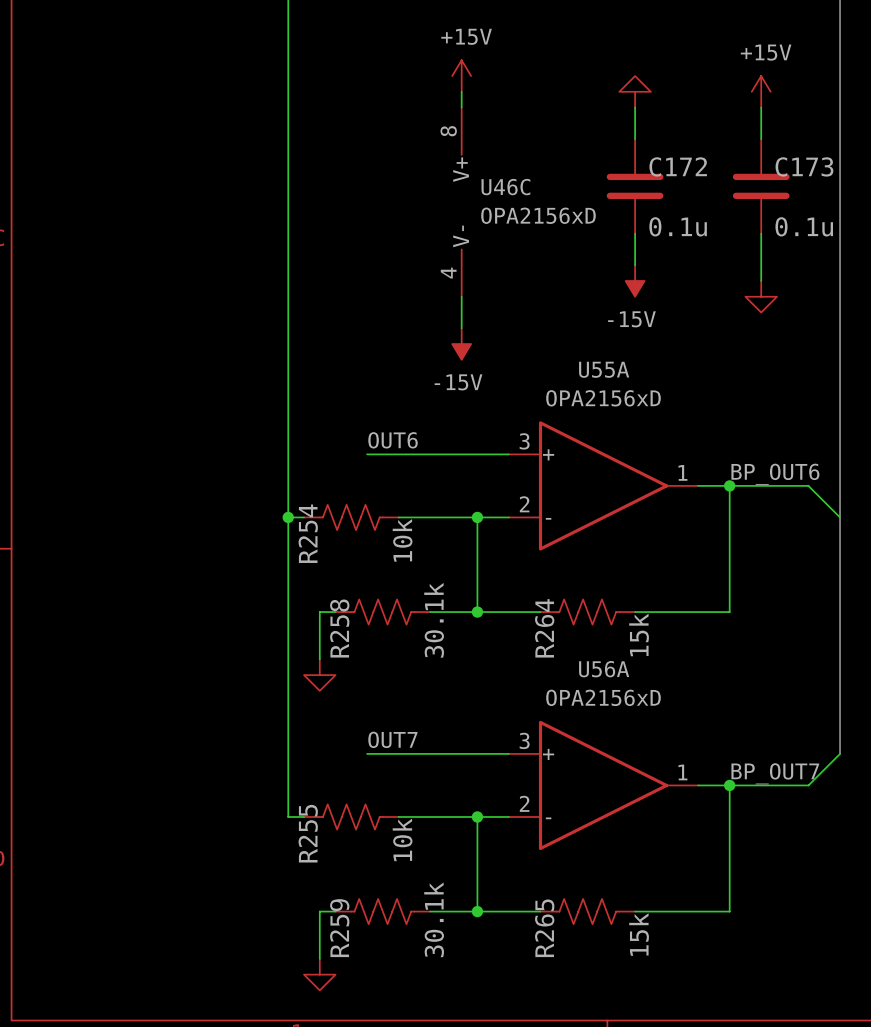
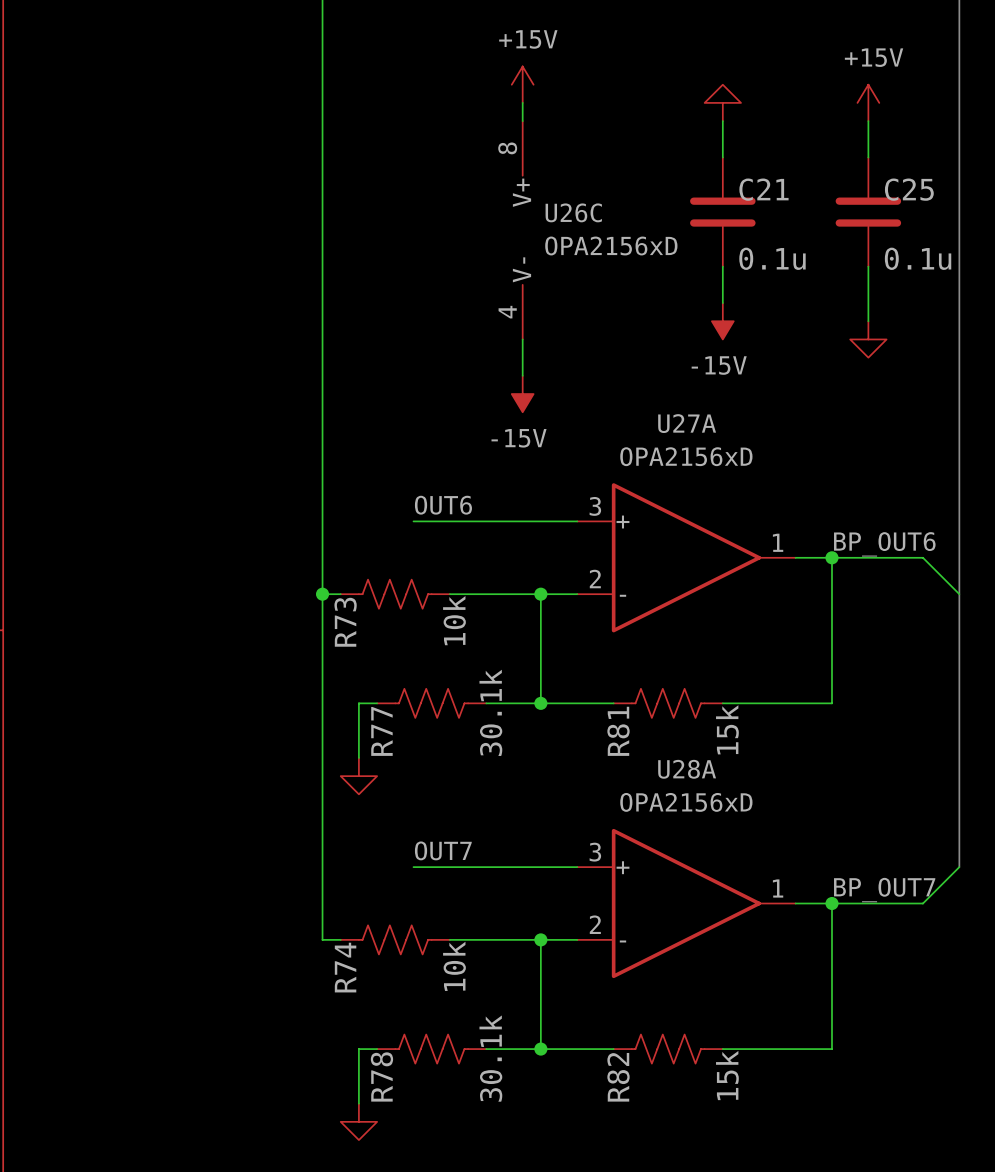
C172 name: C172 (678, 166) -> C21 (763, 189)
C173 name: C173 (804, 166) -> C25 (909, 189)
U46C name: U46C (505, 187) -> U26C (573, 212)
U55A name: U55A (604, 369) -> U27A (687, 423)
R254 name: R254 (308, 533) -> R73 (345, 622)
R258 name: R258 (339, 628) -> R77 (381, 731)
R264 name: R264 (544, 628) -> R81 (618, 731)
U56A name: U56A (604, 669) -> U28A (687, 769)
R255 name: R255 (308, 833) -> R74 (345, 967)
R259 name: R259 (339, 928) -> R78 (381, 1076)
R265 name: R265 (544, 928) -> R82 (618, 1077)

